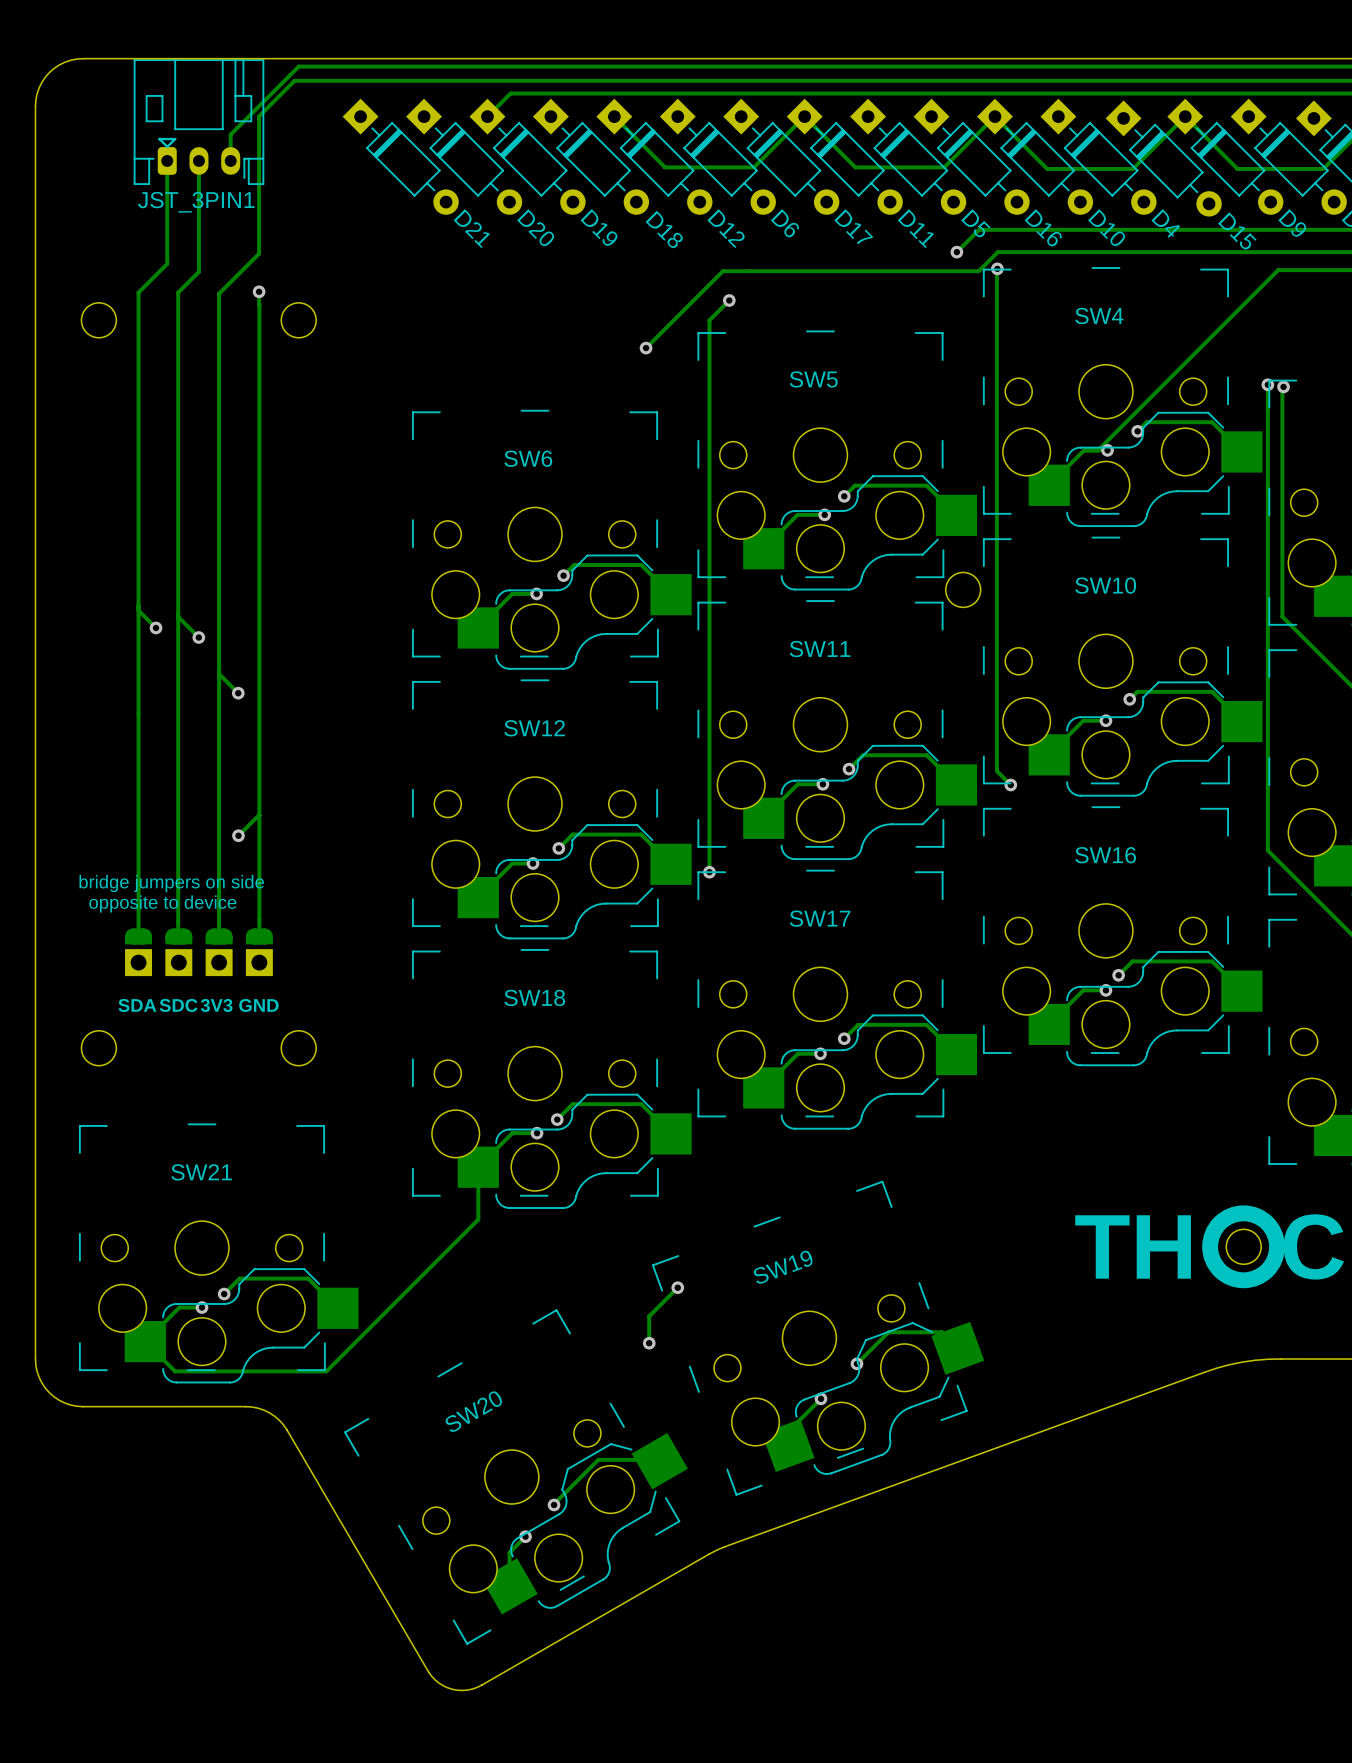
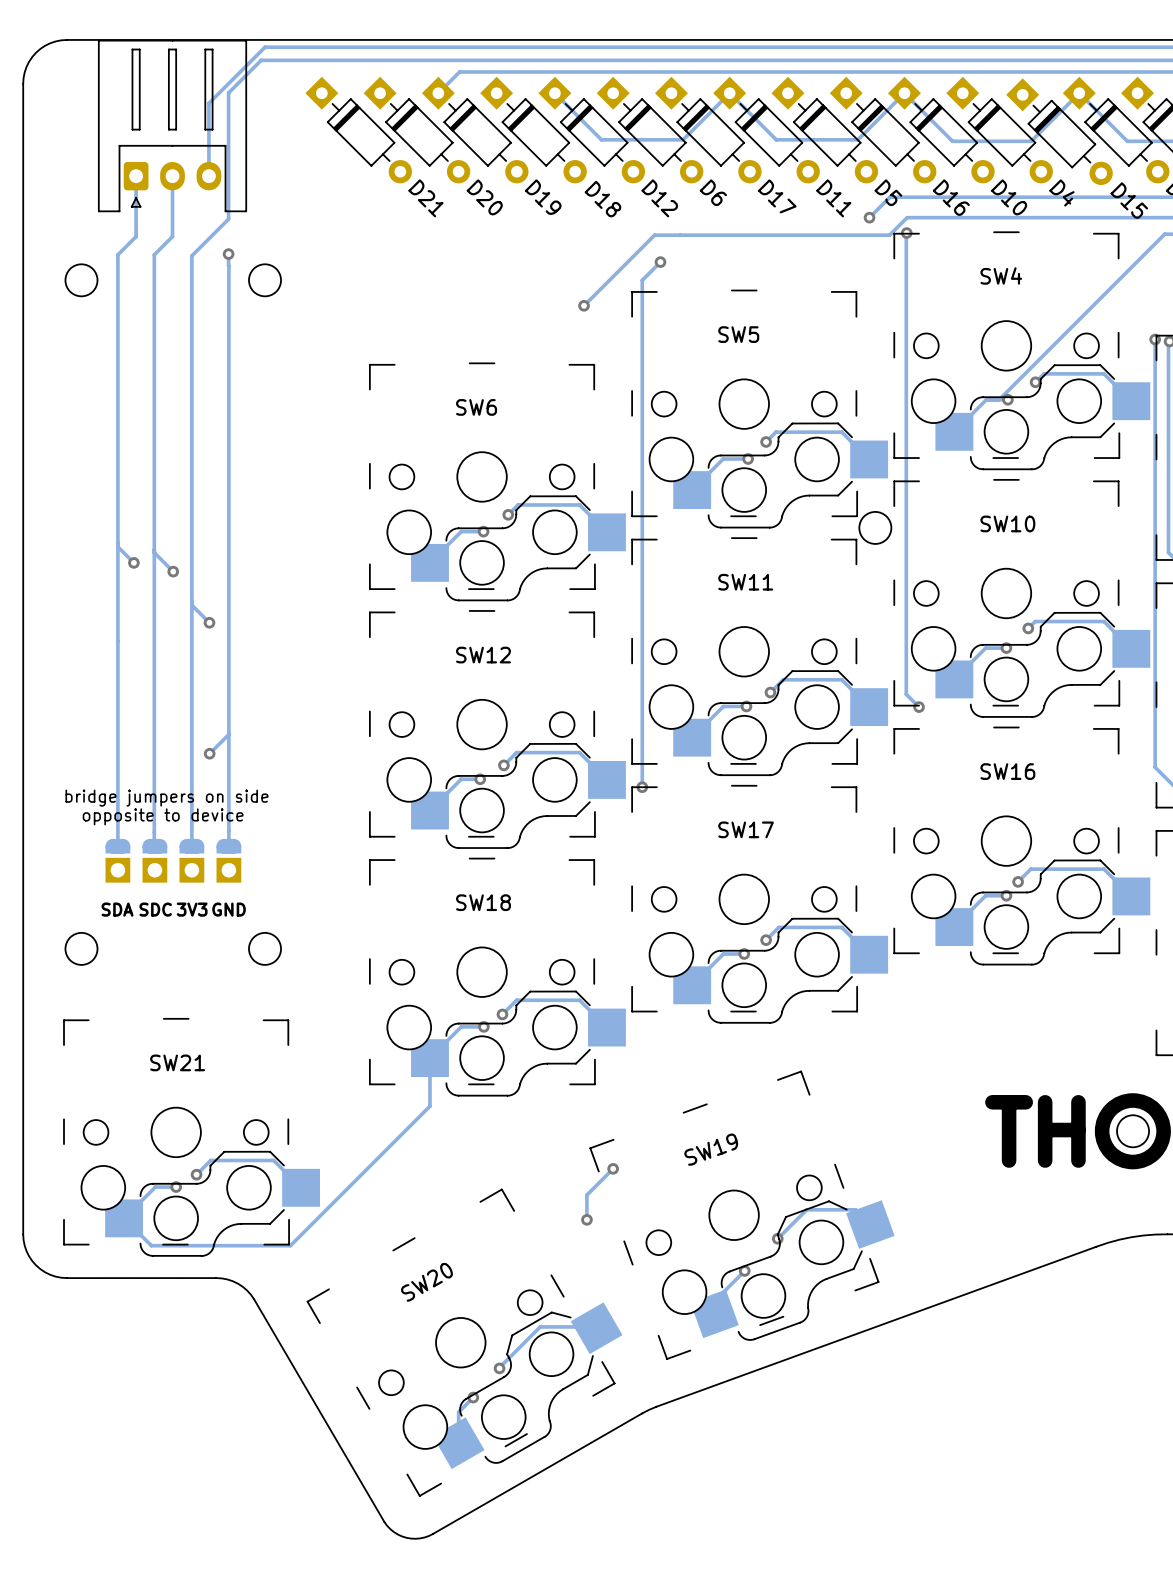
drawing: none -> [97, 39, 248, 213]
drawing: [133, 59, 265, 186] -> none
track: (237, 127) (230, 134) (230, 160) -> (208, 103) (208, 176)
line: (175, 139) (159, 139) (167, 146) (175, 139) -> none
track: (167, 160) (167, 263) (158, 272) -> (136, 176) (136, 236)
track: (198, 160) (198, 272) -> (172, 176) (172, 236)
part: (198, 160) -> none
text: JST_3PIN1 (196, 202) -> none
part: none -> (172, 176)

